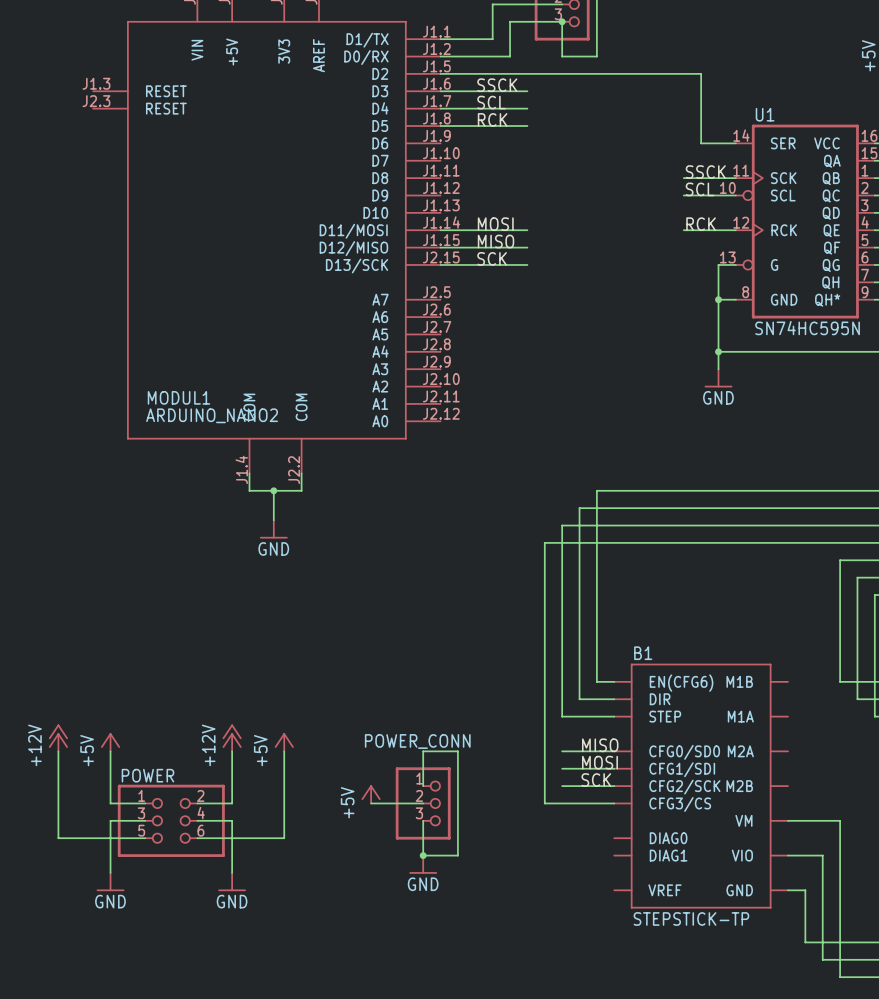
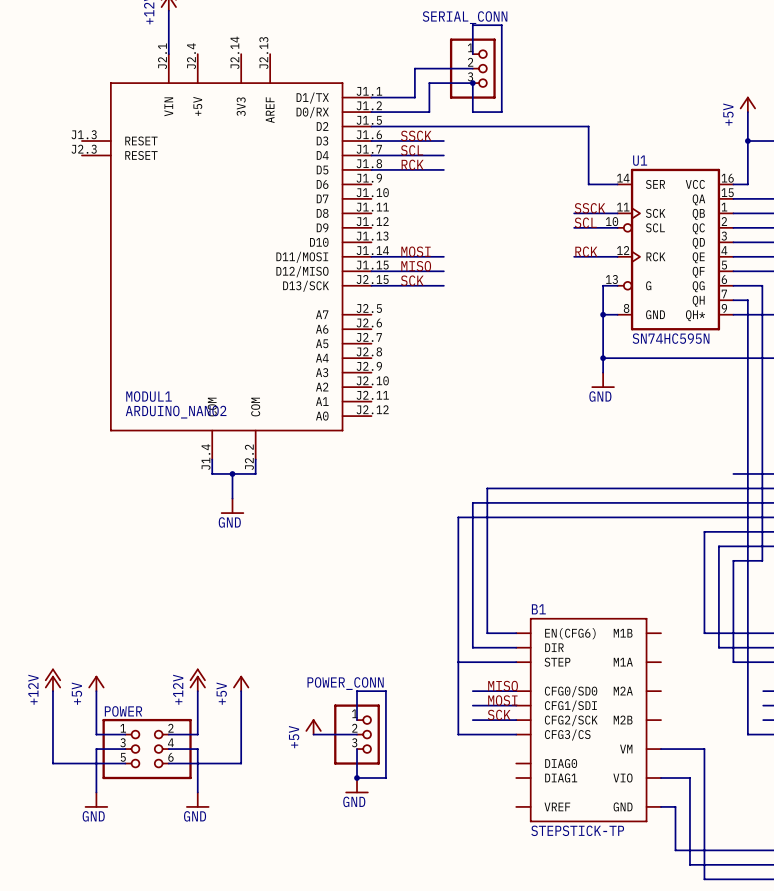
wire: (874, 490) (596, 490) (596, 681) -> none
wire: (579, 681) (579, 699) -> (487, 633) (501, 633)
wire: (562, 699) (562, 716) -> (458, 662) (472, 662)
wire: none -> (472, 647) (487, 647)

